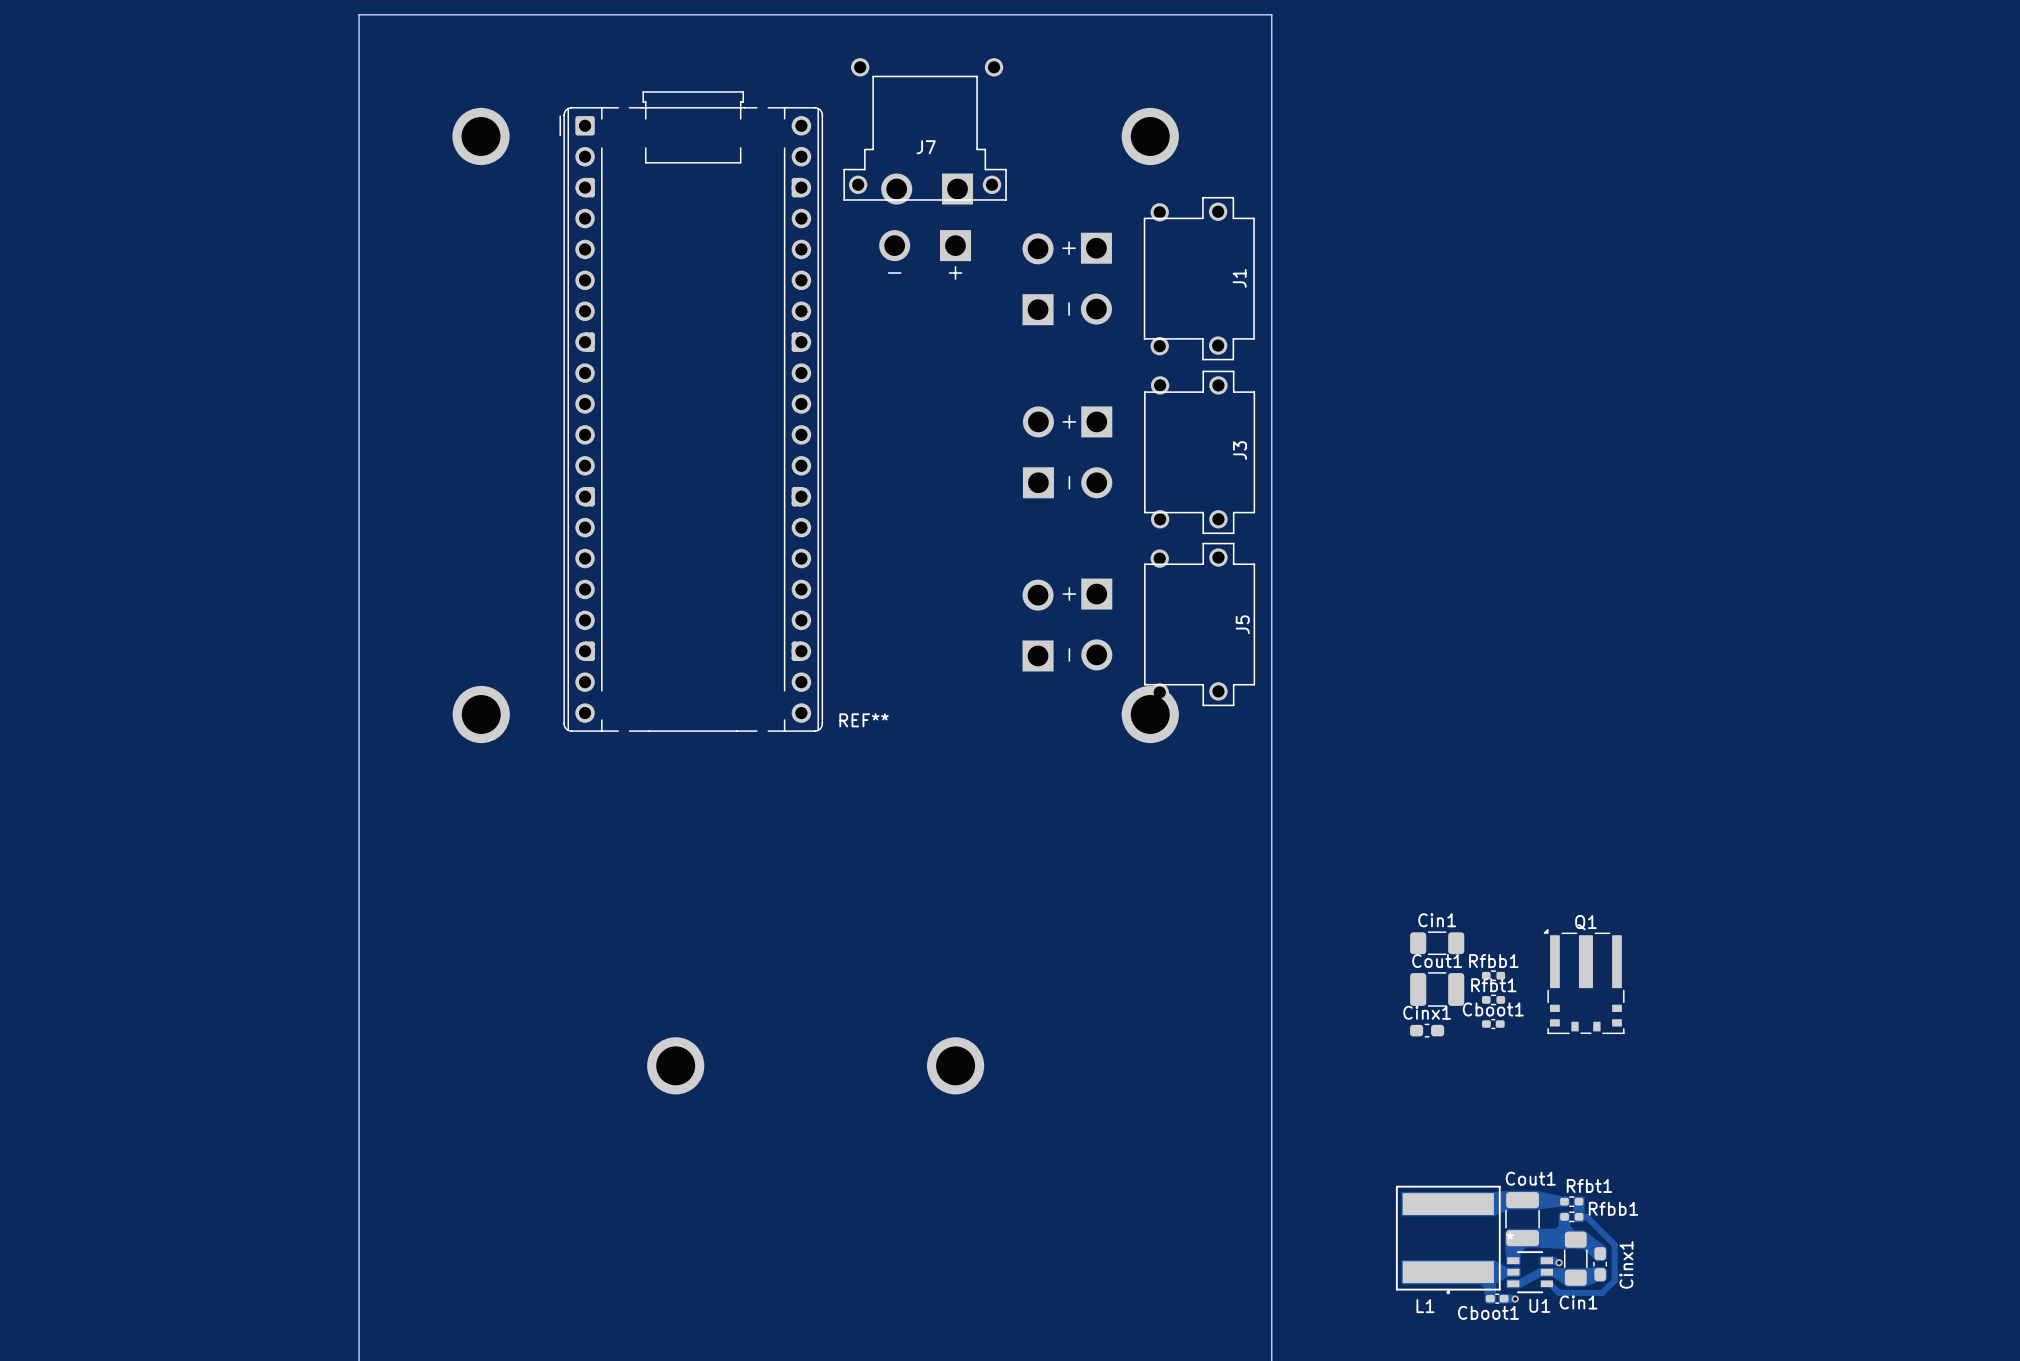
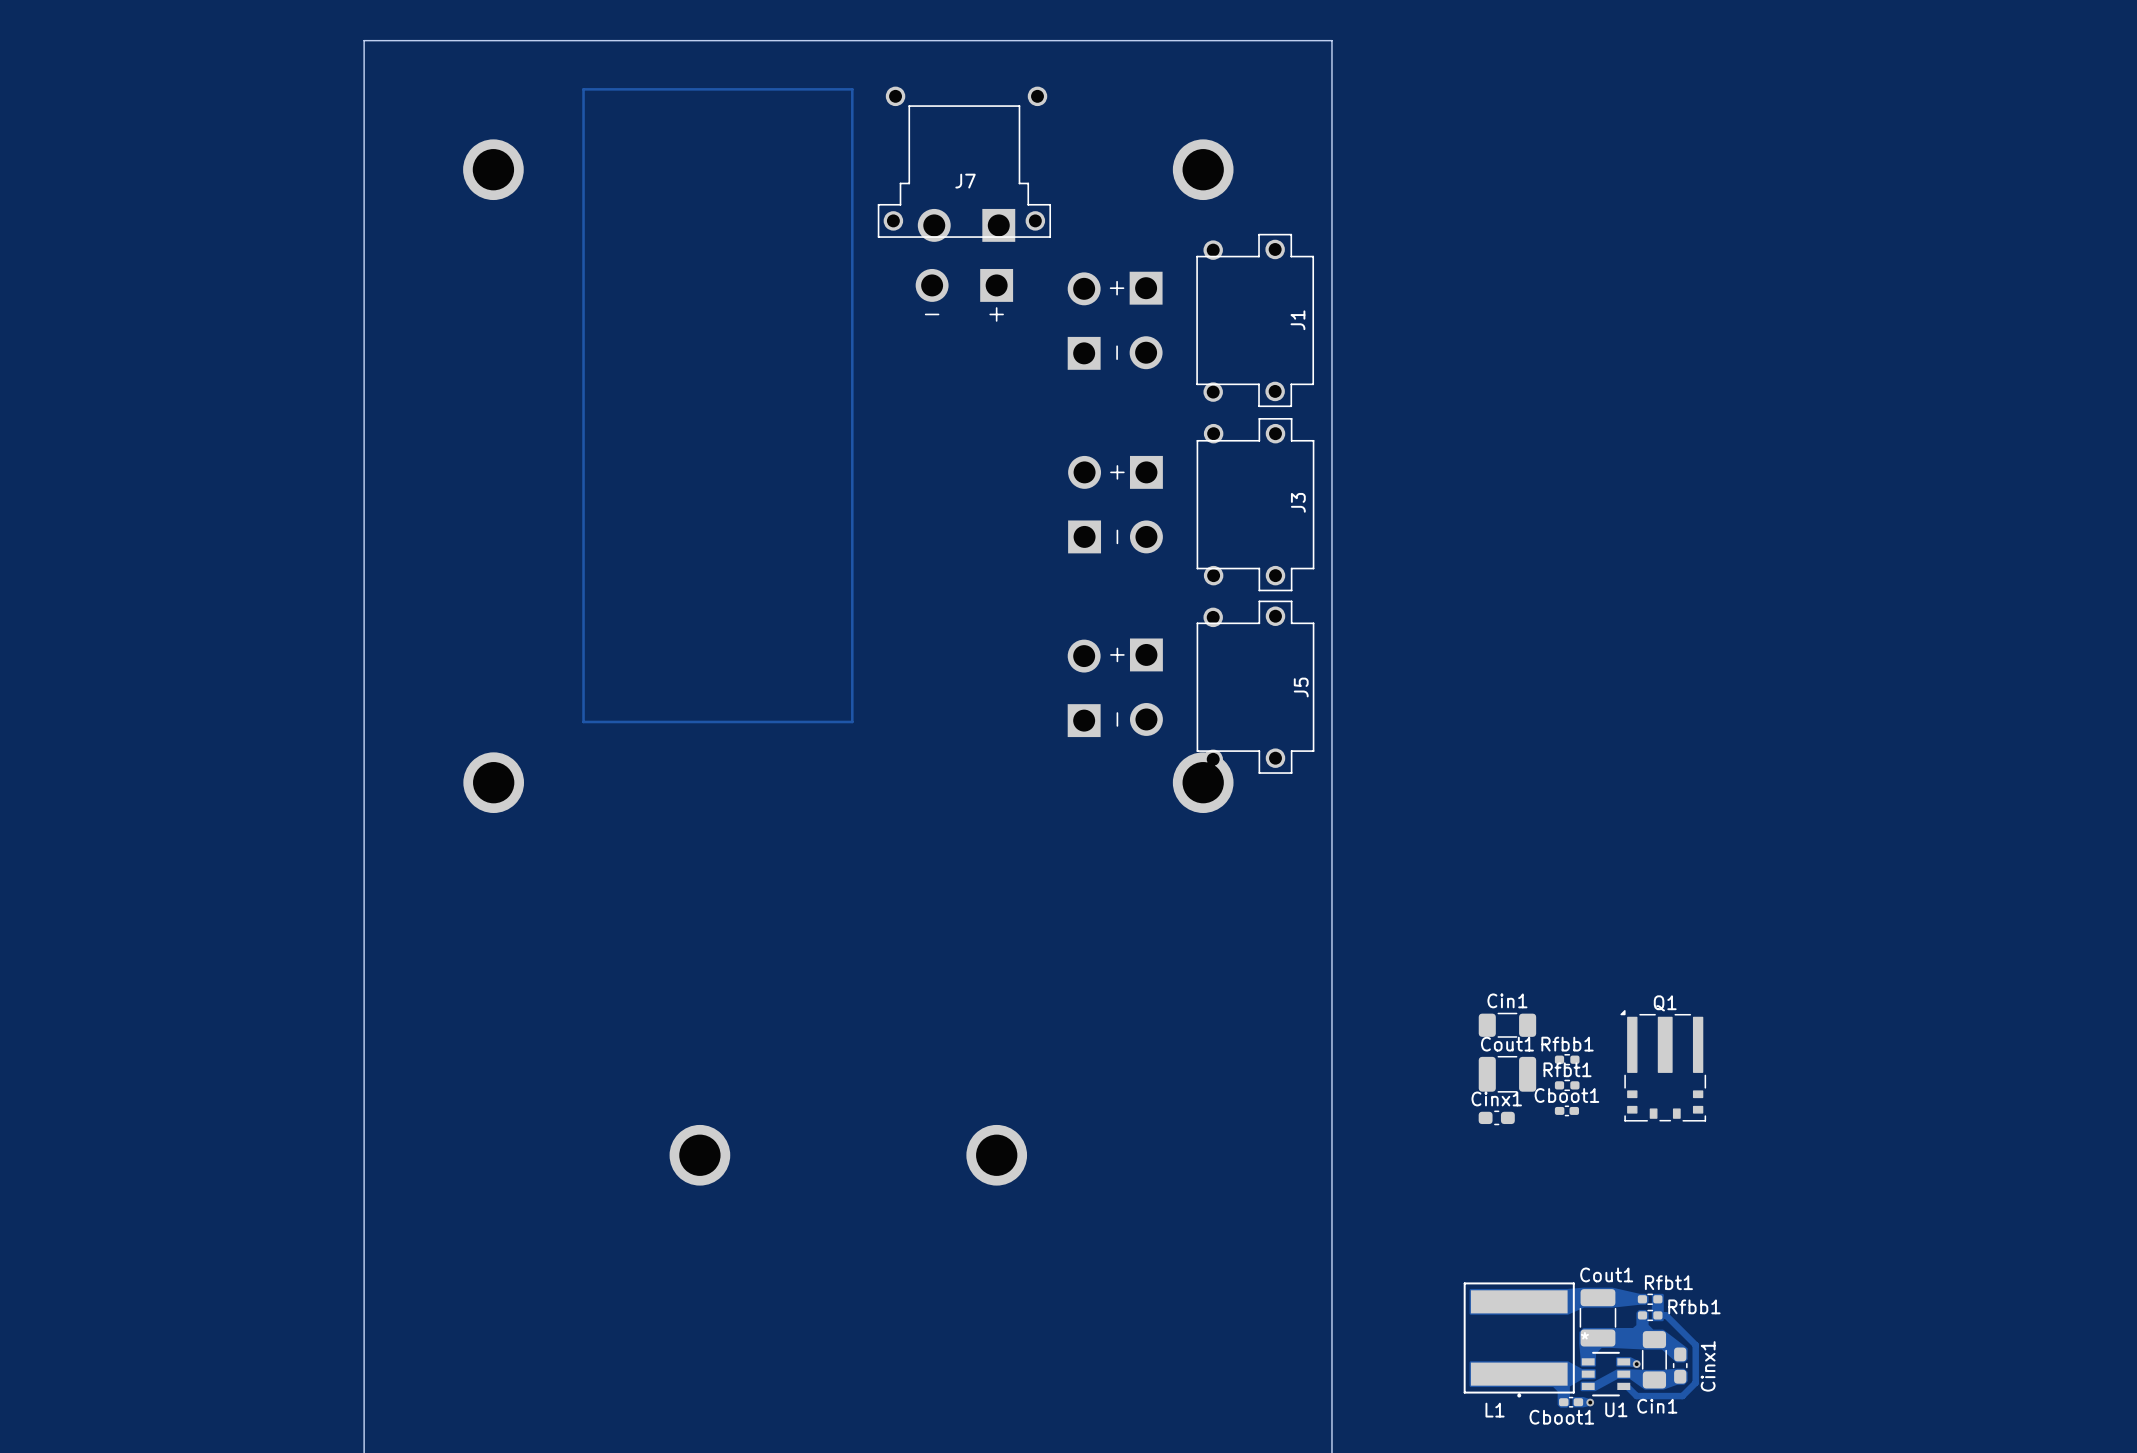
track: none -> (583, 89) (852, 89) (852, 721) (583, 721) (583, 89)
REF**: (691, 411) -> none

